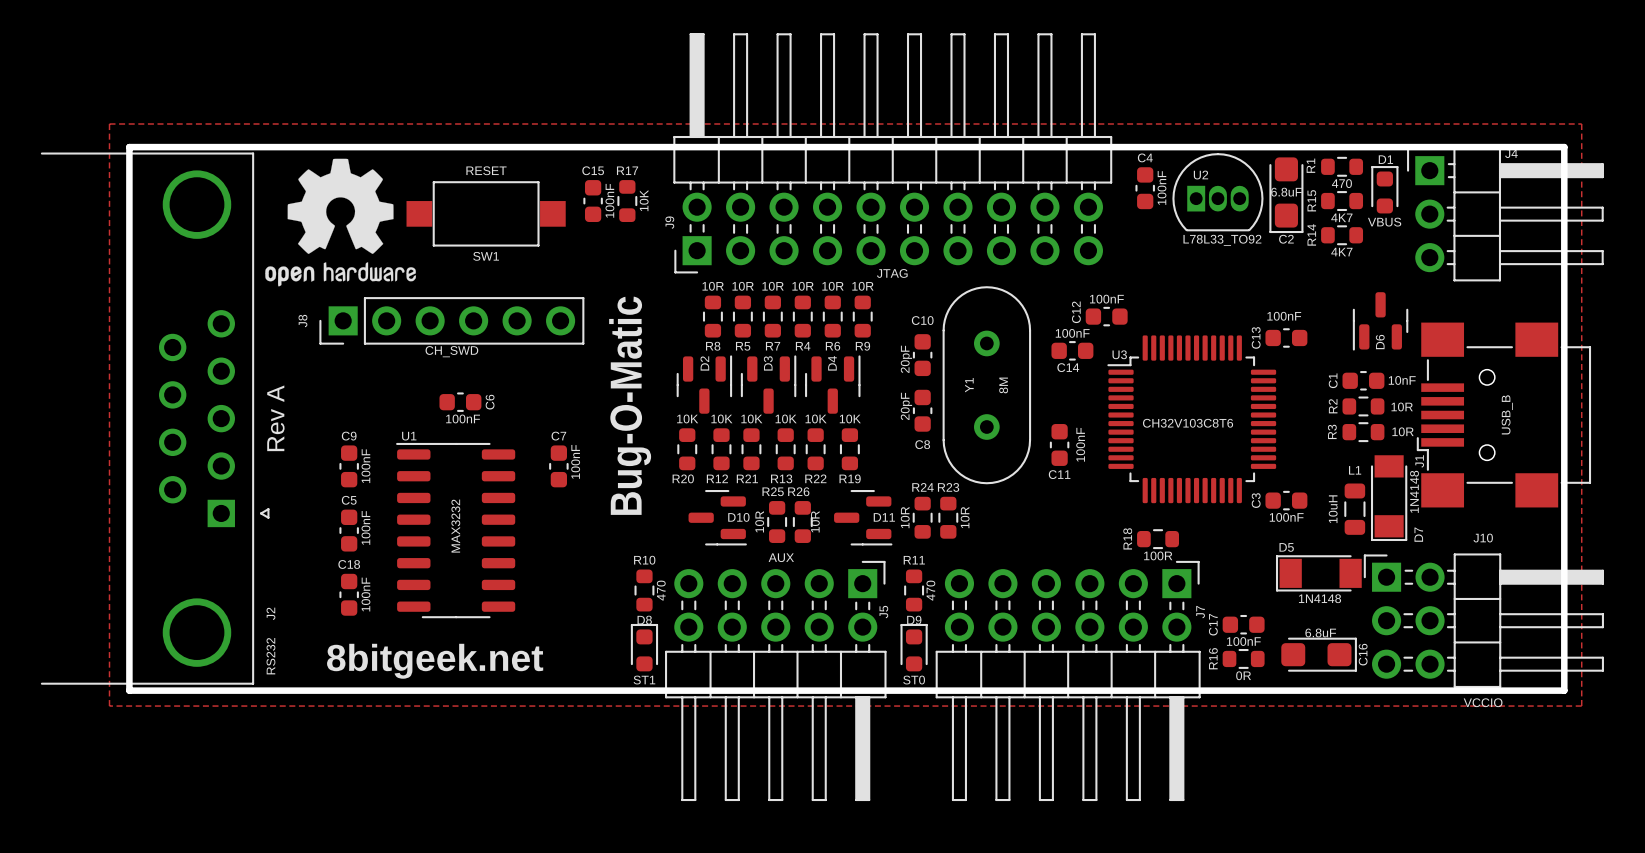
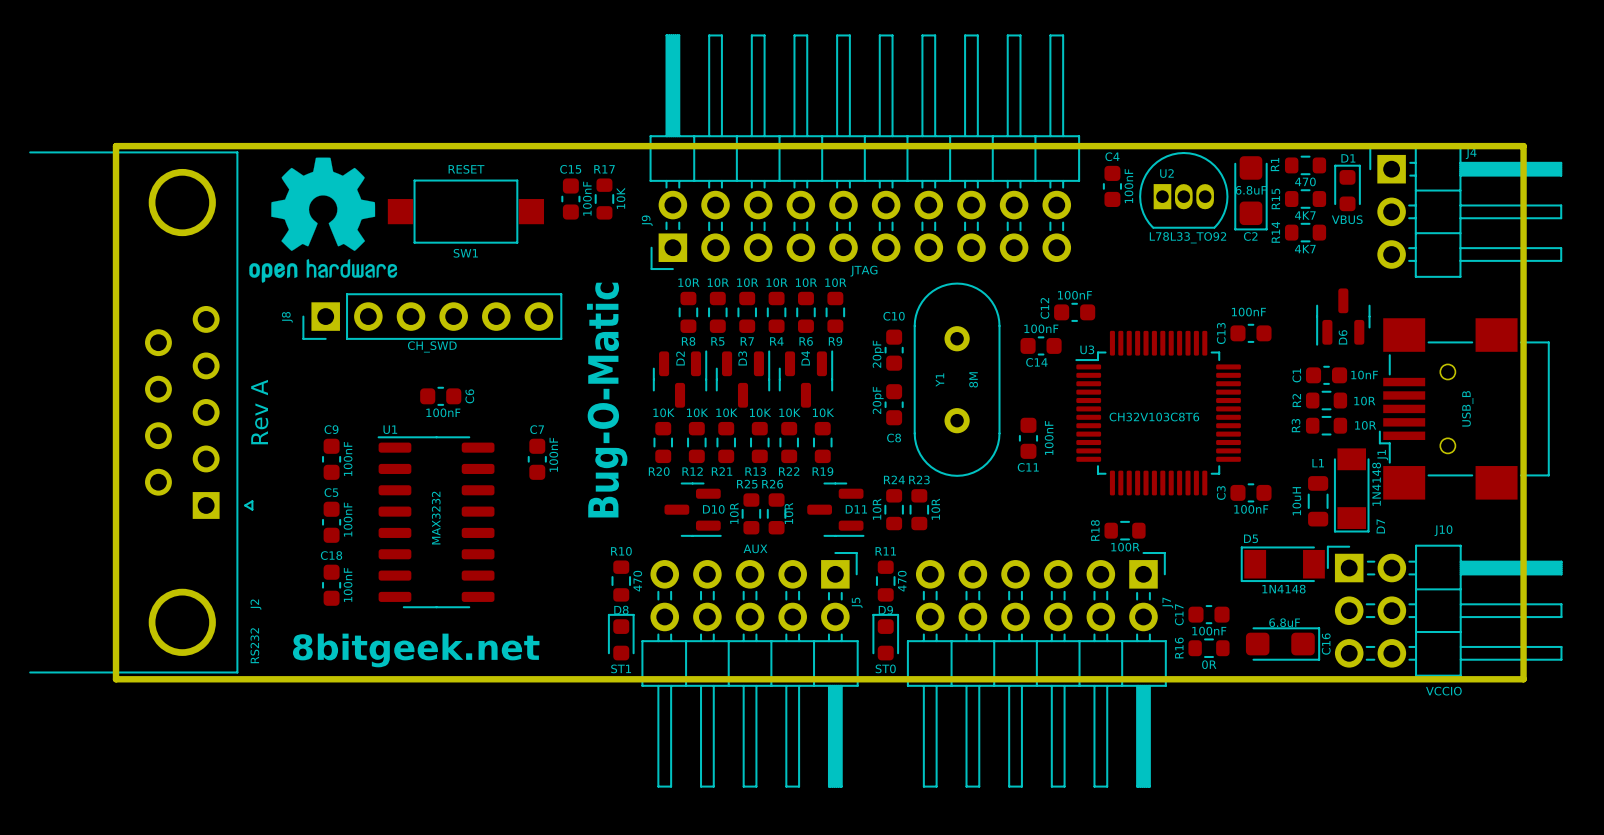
zone outline: (109, 124) (109, 706) (1581, 706) (1581, 124) (109, 124) -> none

